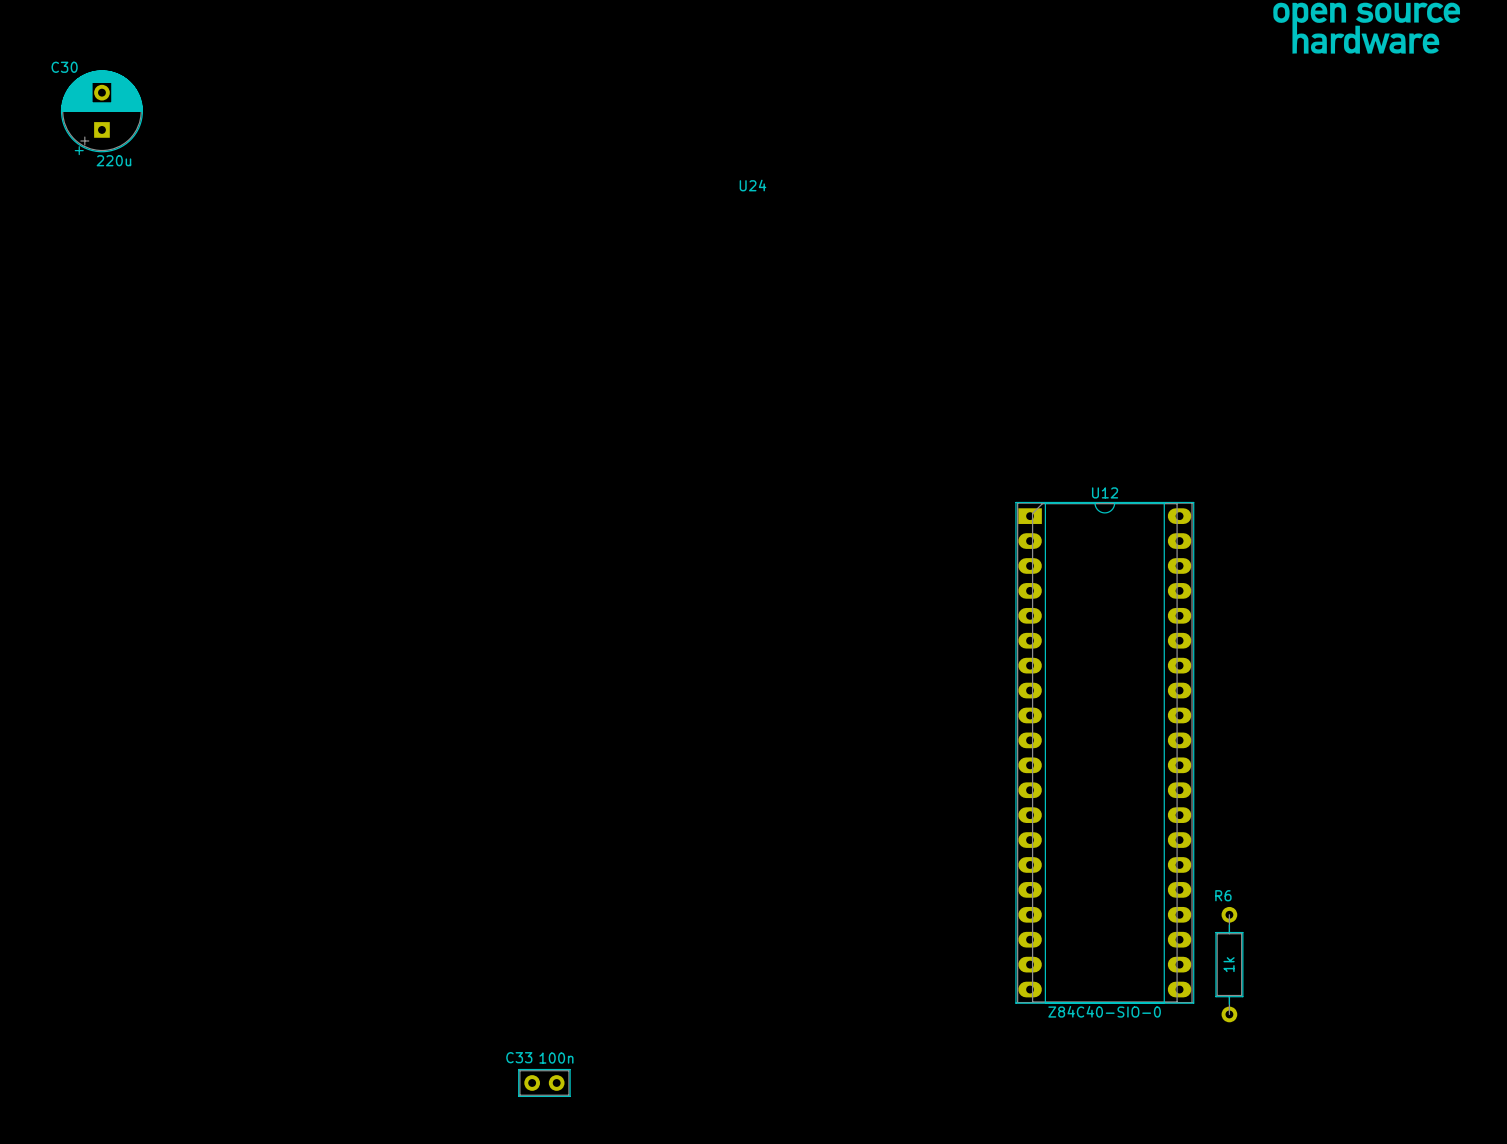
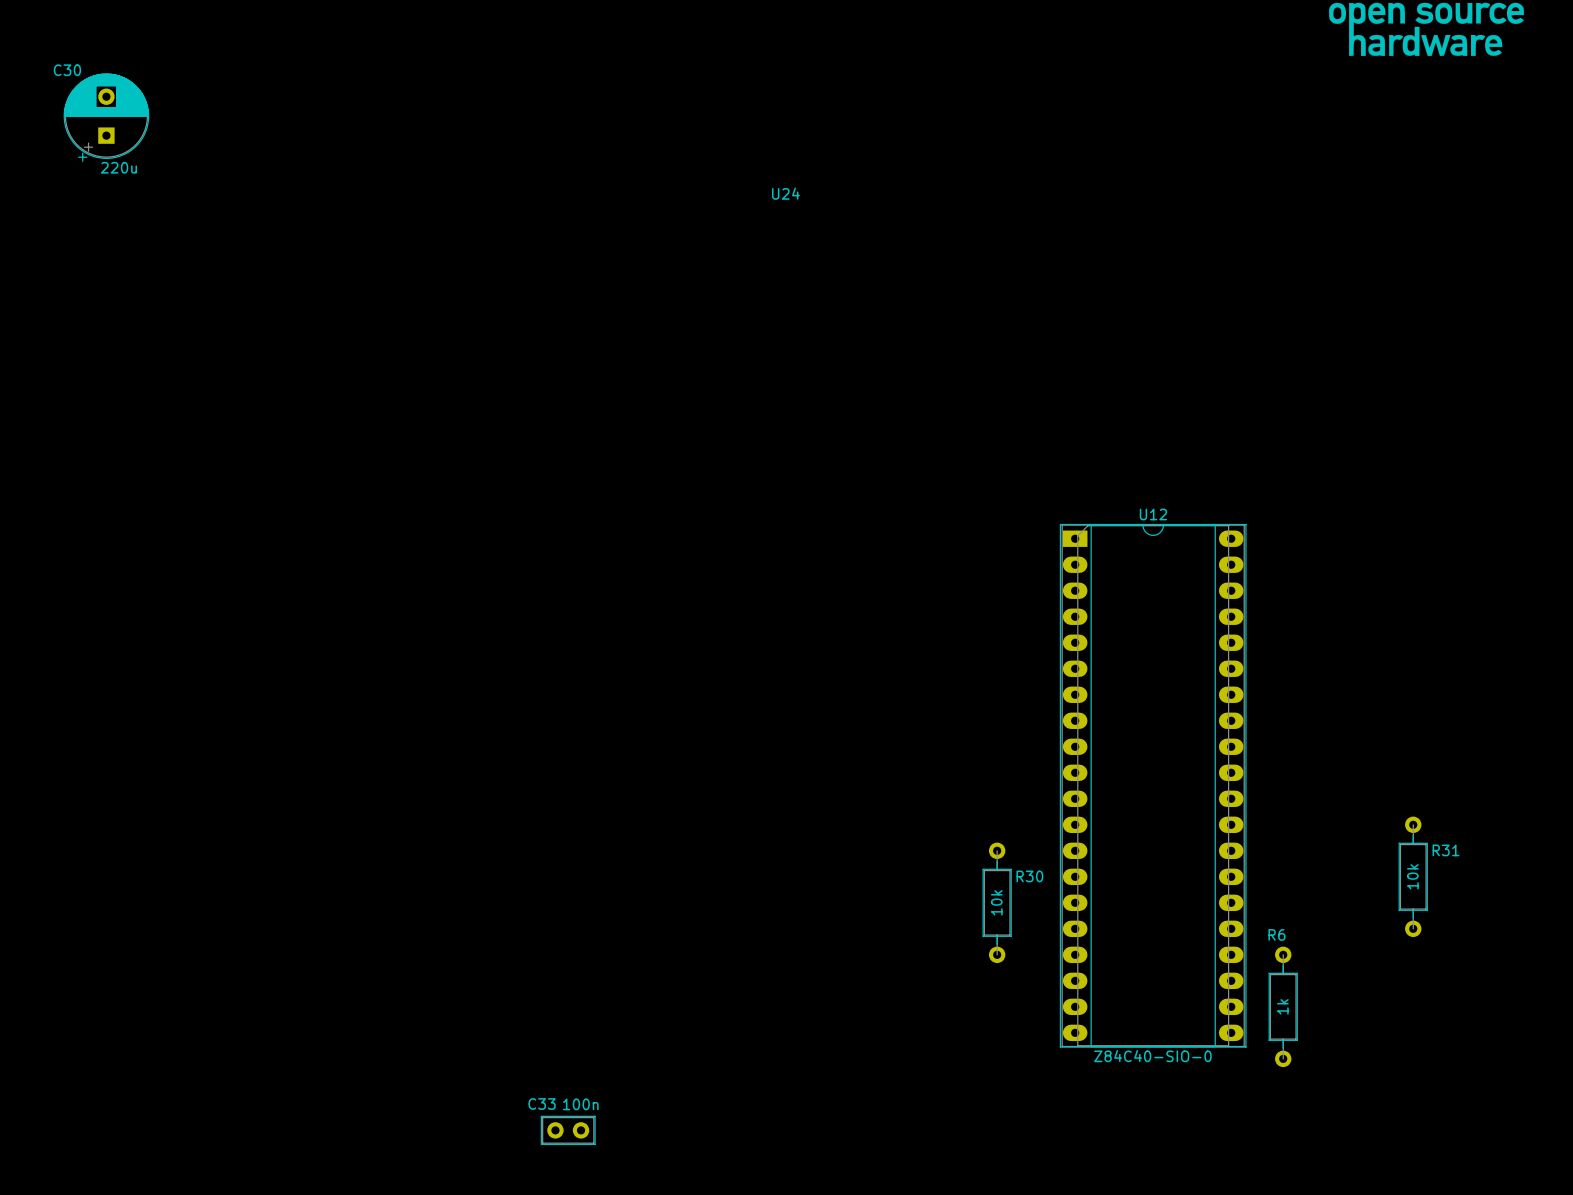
R31: none -> 10k (1413, 876)
R30: none -> 10k (997, 902)

